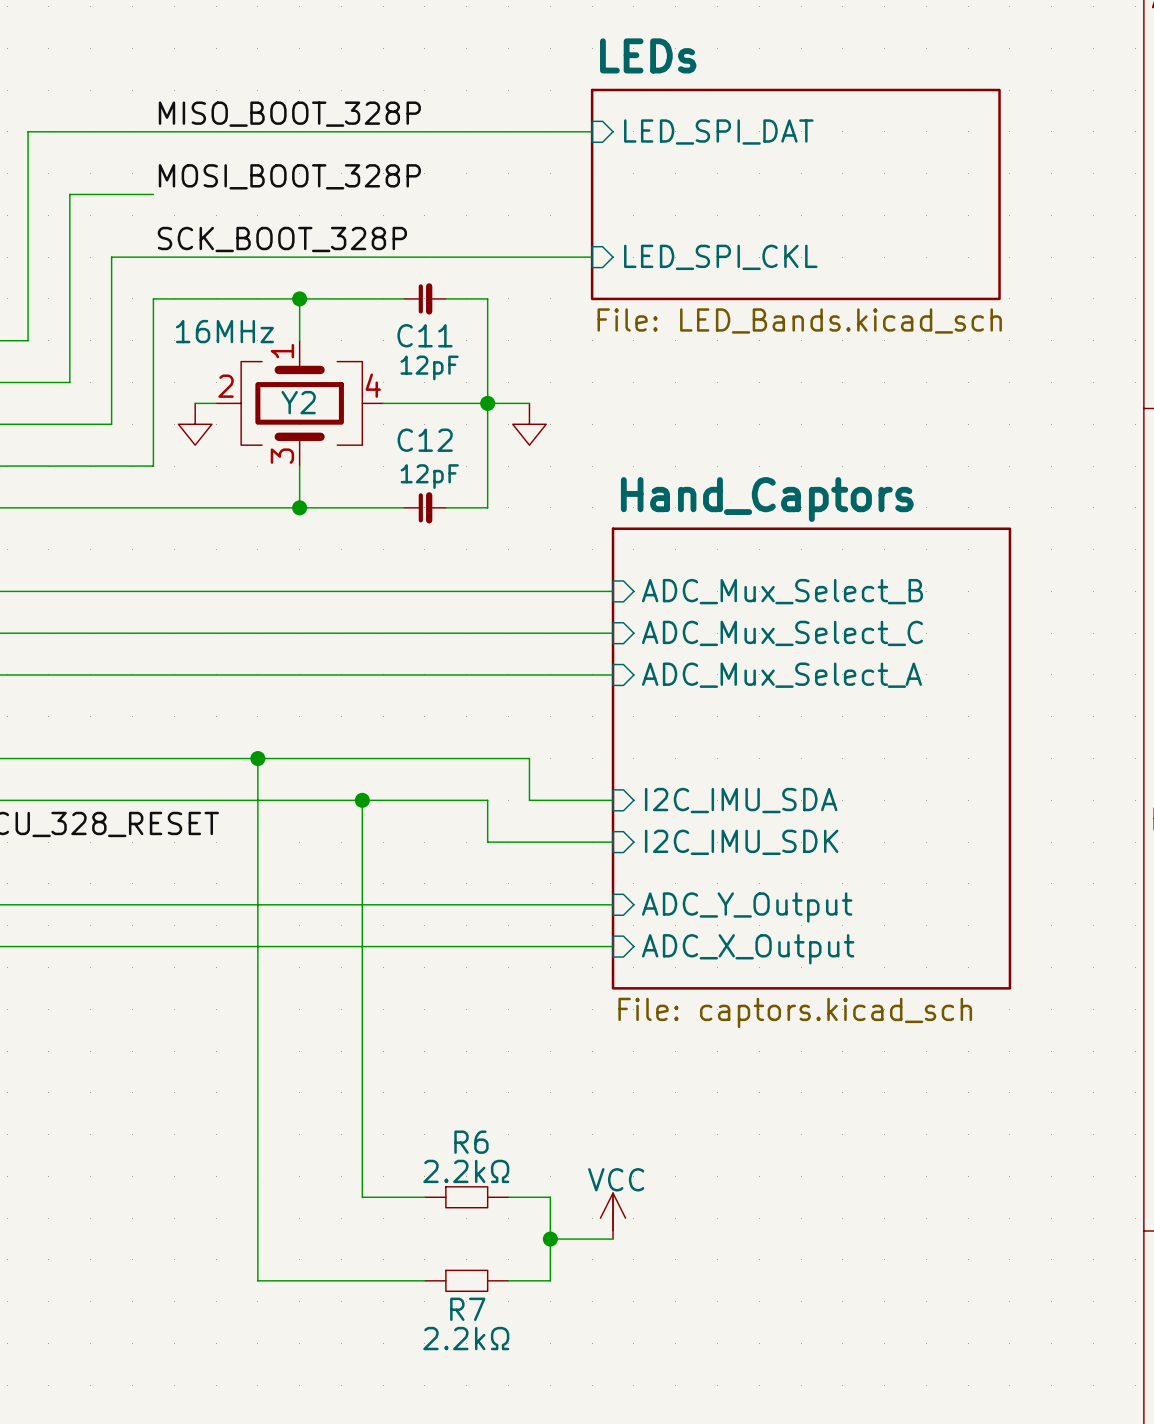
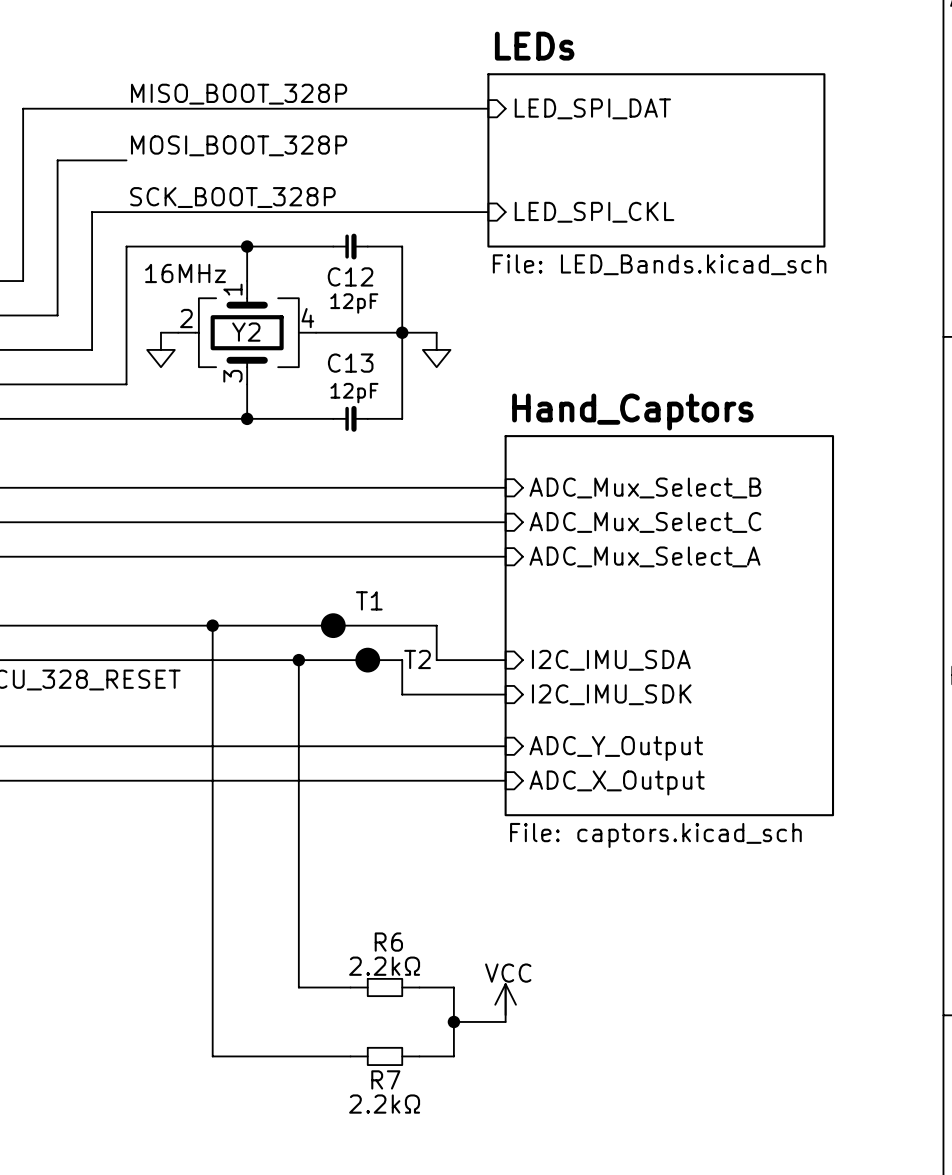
C11 name: C11 (424, 335) -> C12 (350, 276)
C12 name: C12 (425, 440) -> C13 (350, 363)
T1: none -> (333, 625)
T2: none -> (367, 660)

